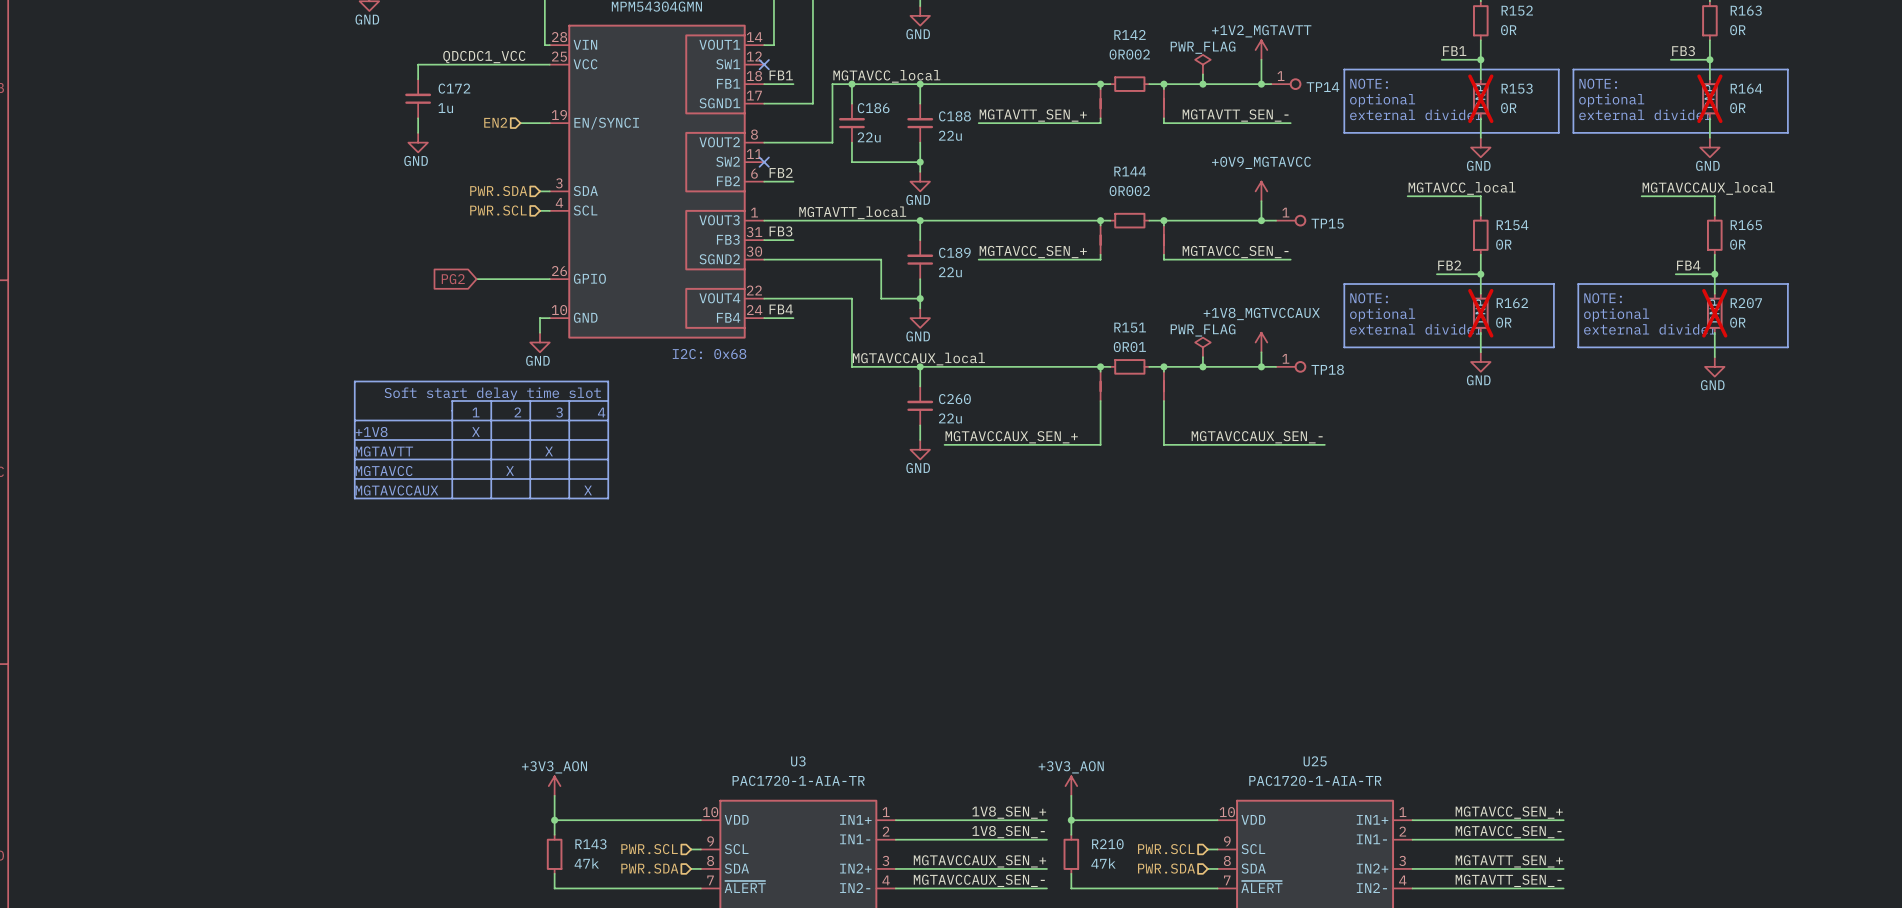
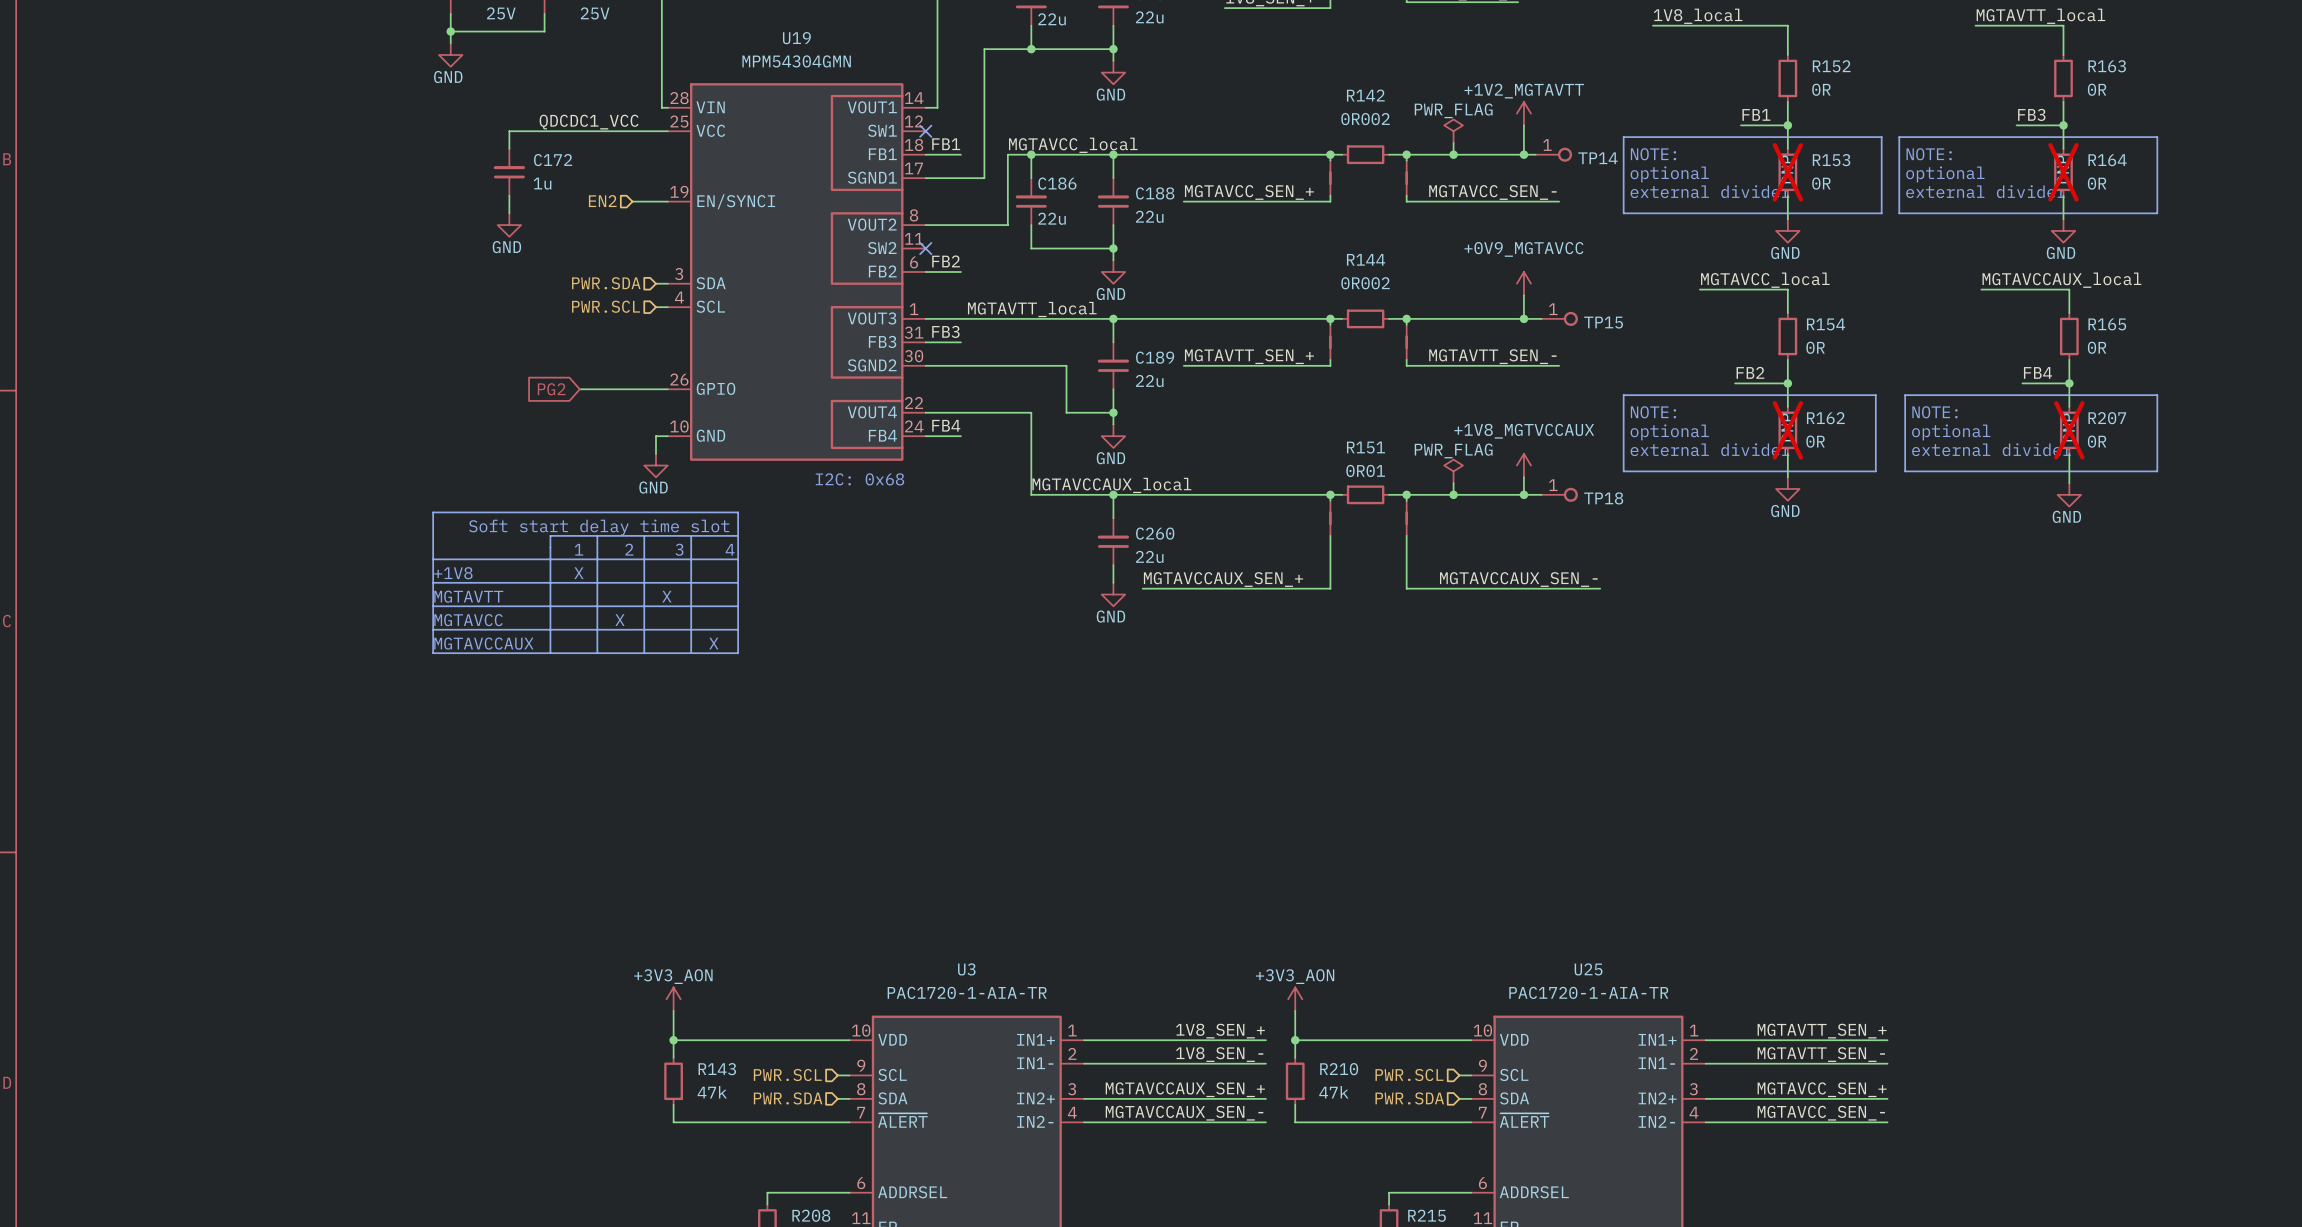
label: MGTAVTT_SEN_+ (1033, 115) -> MGTAVCC_SEN_+ (1249, 192)
label: MGTAVTT_SEN_- (1235, 115) -> MGTAVCC_SEN_- (1492, 192)
label: MGTAVCC_SEN_+ (1033, 252) -> MGTAVTT_SEN_+ (1249, 356)
label: MGTAVCC_SEN_- (1235, 252) -> MGTAVTT_SEN_- (1492, 356)
label: MGTAVCC_SEN_+ (1509, 812) -> MGTAVTT_SEN_+ (1822, 1031)
label: MGTAVCC_SEN_- (1508, 832) -> MGTAVTT_SEN_- (1821, 1054)
label: MGTAVTT_SEN_+ (1509, 861) -> MGTAVCC_SEN_+ (1822, 1089)
label: MGTAVTT_SEN_- (1508, 880) -> MGTAVCC_SEN_- (1821, 1113)

